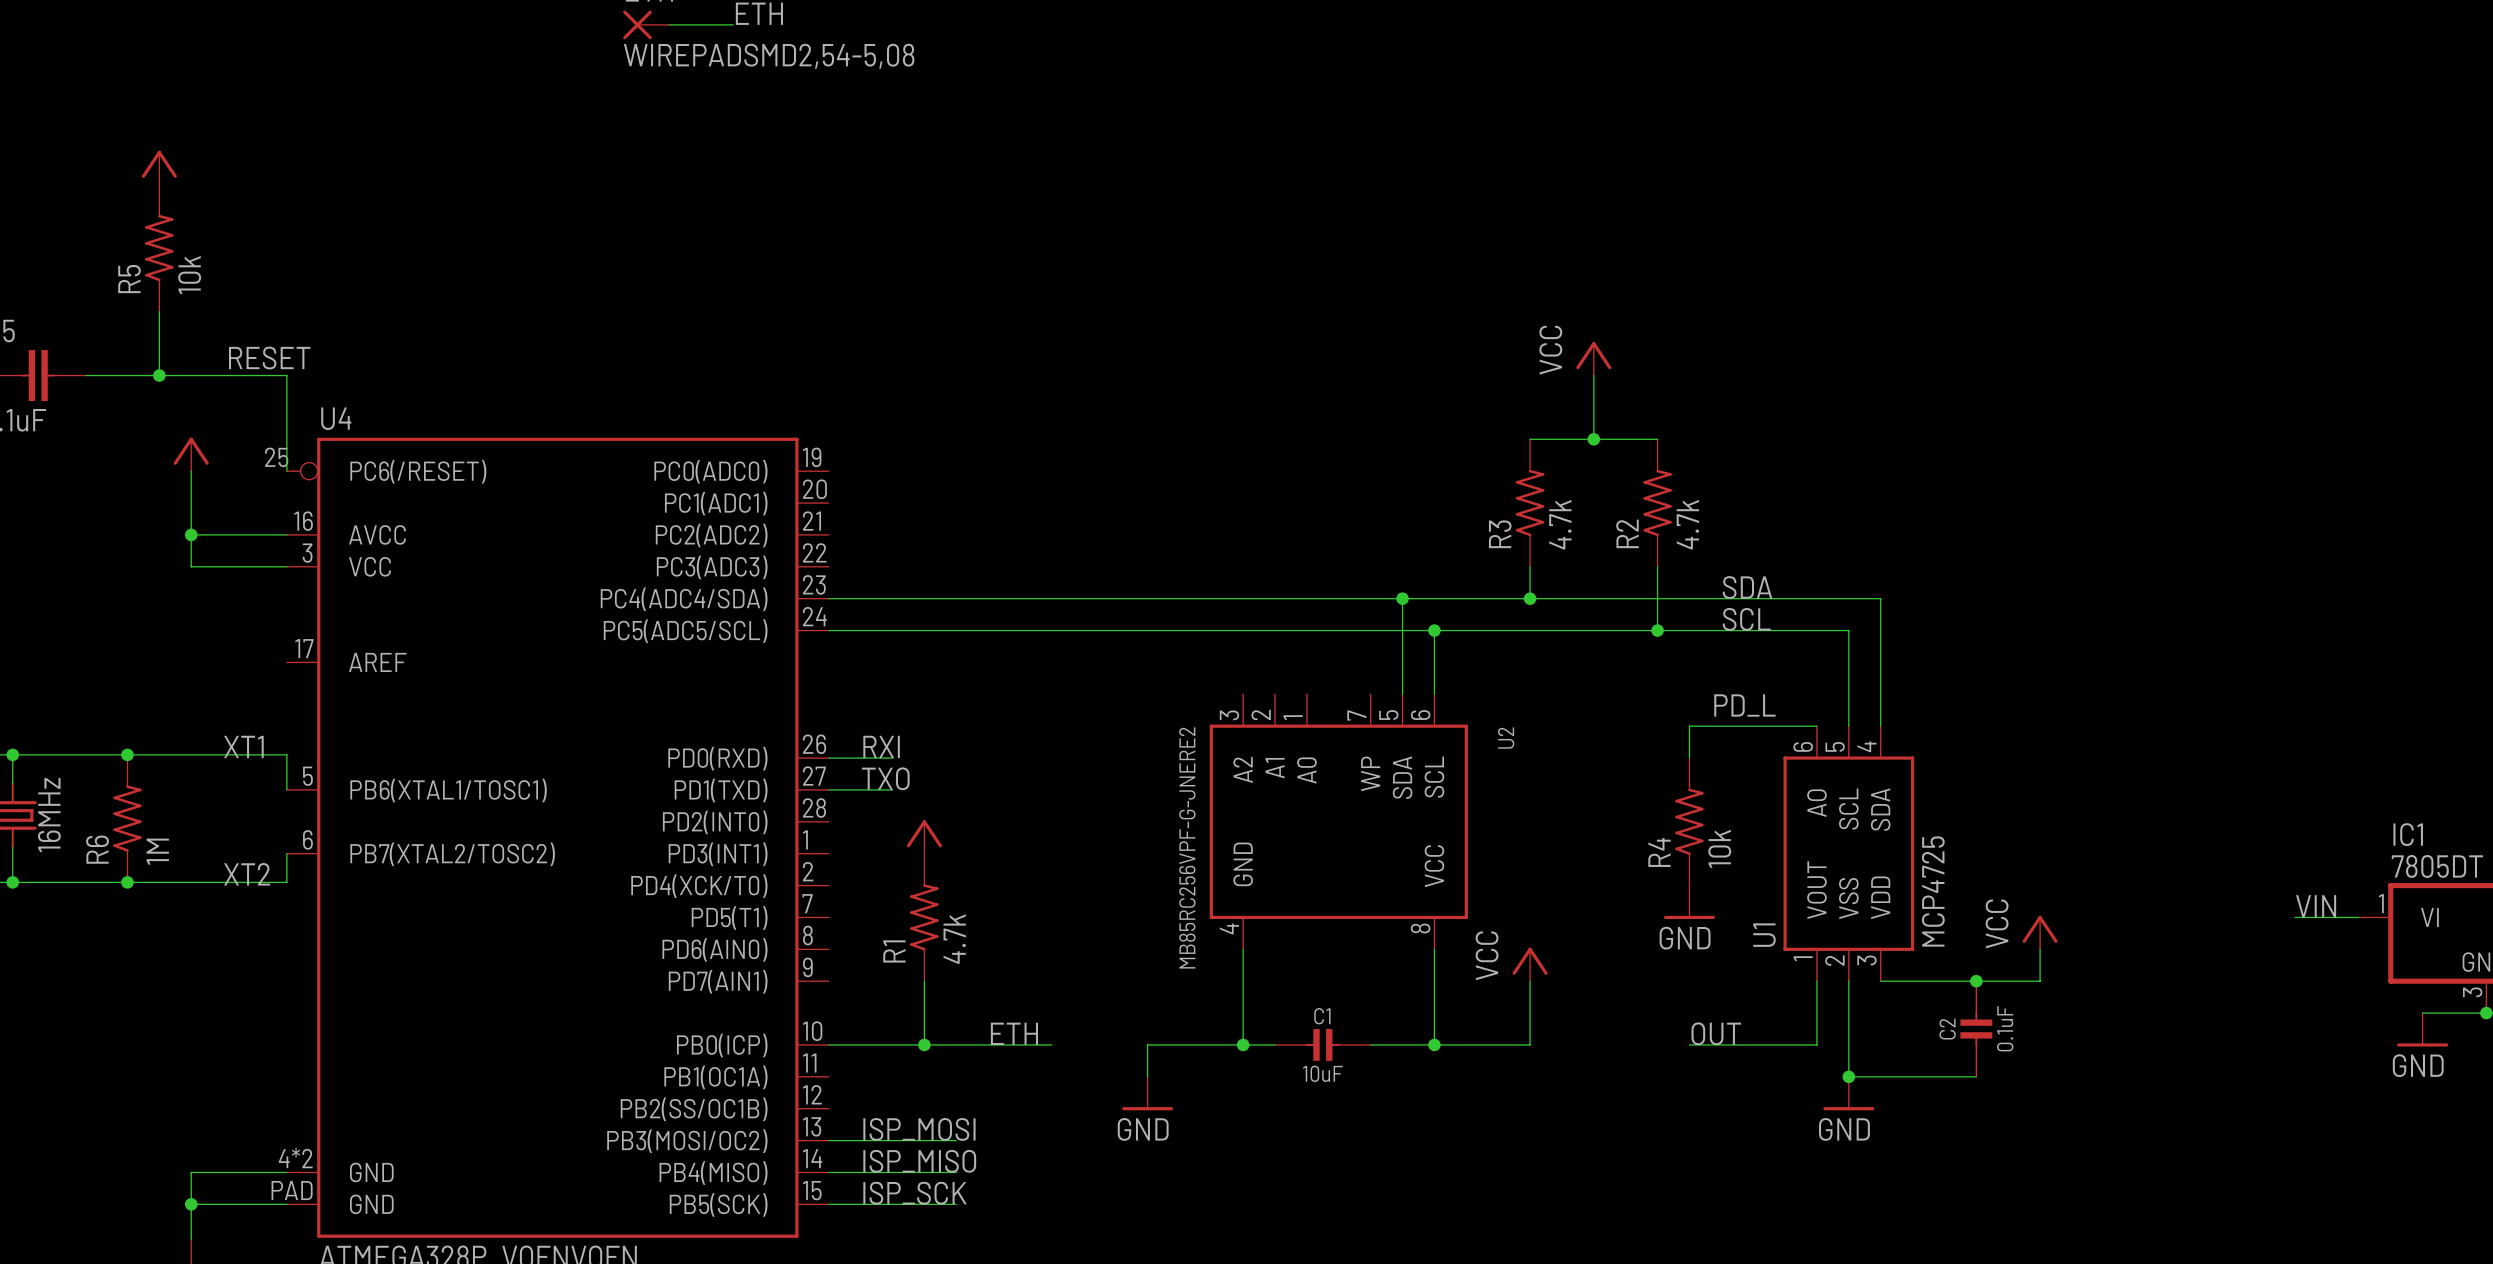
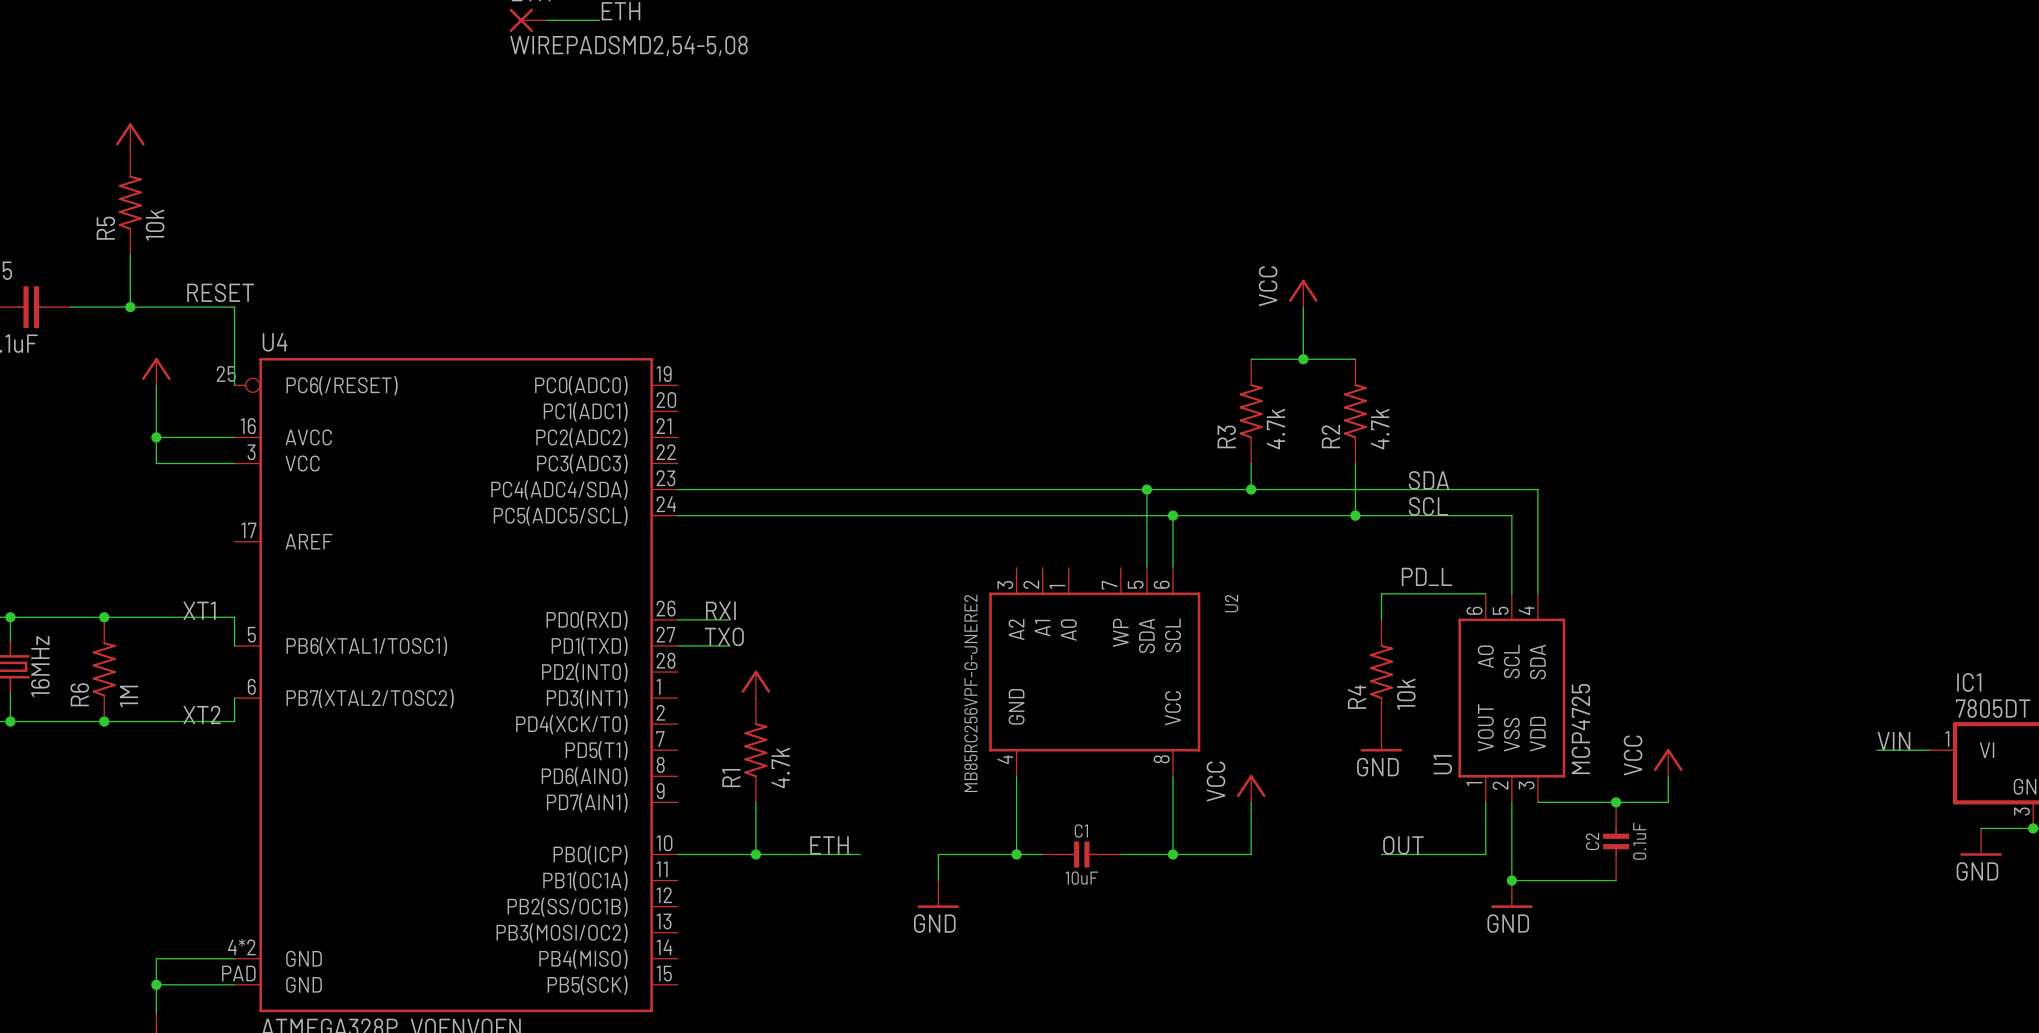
label: ISP_MOSI (919, 1129) -> none
wire: (828, 1140) (956, 1140) -> none
label: ISP_MISO (919, 1161) -> none
wire: (828, 1172) (956, 1172) -> none
label: ISP_SCK (914, 1193) -> none
wire: (828, 1204) (956, 1204) -> none

